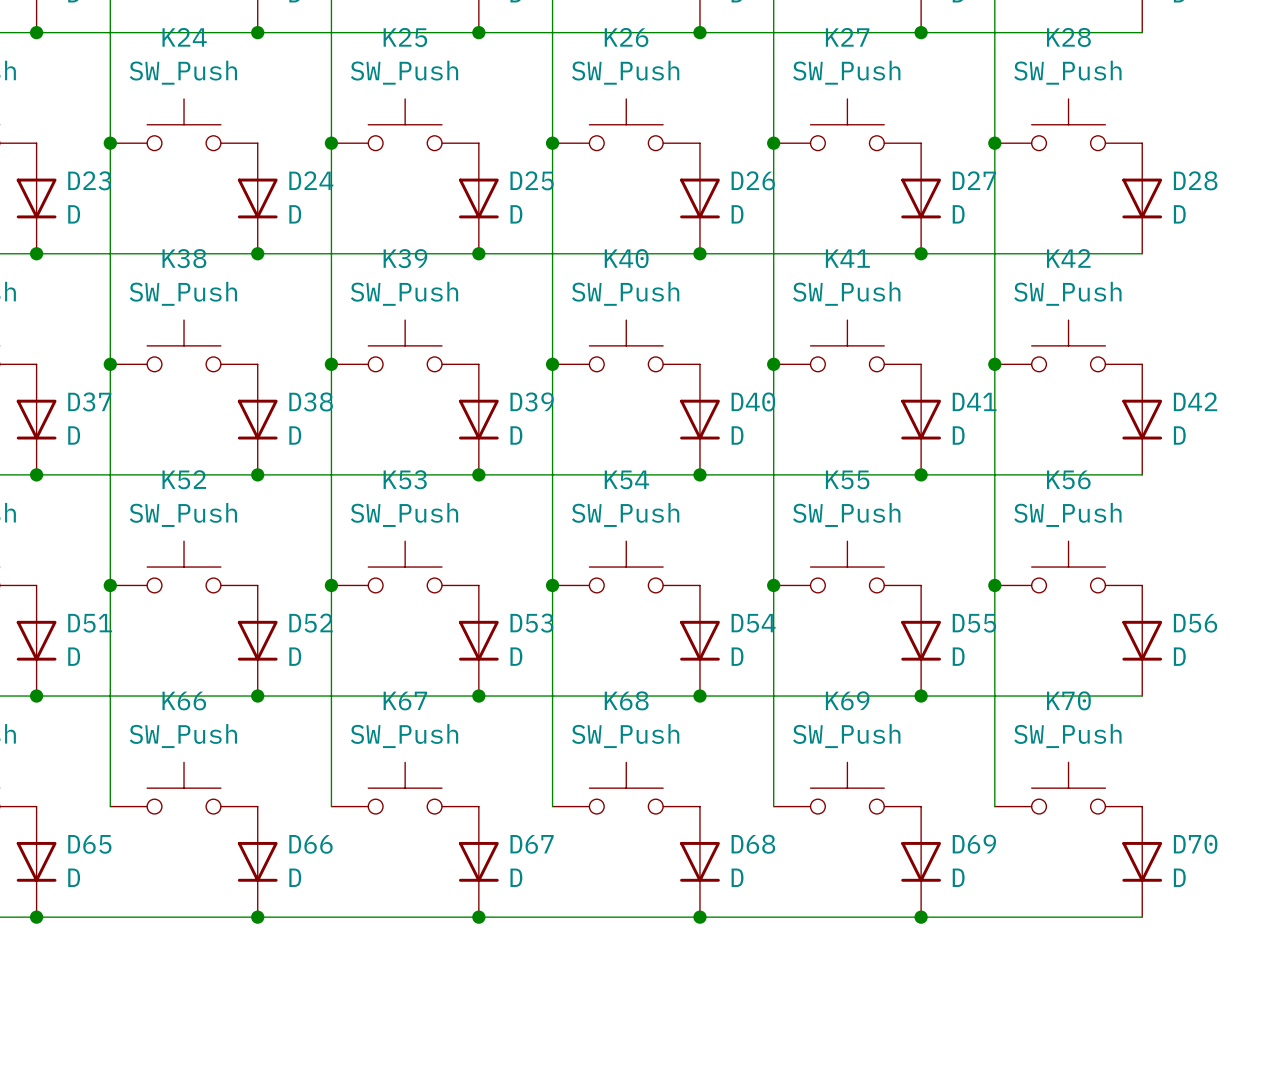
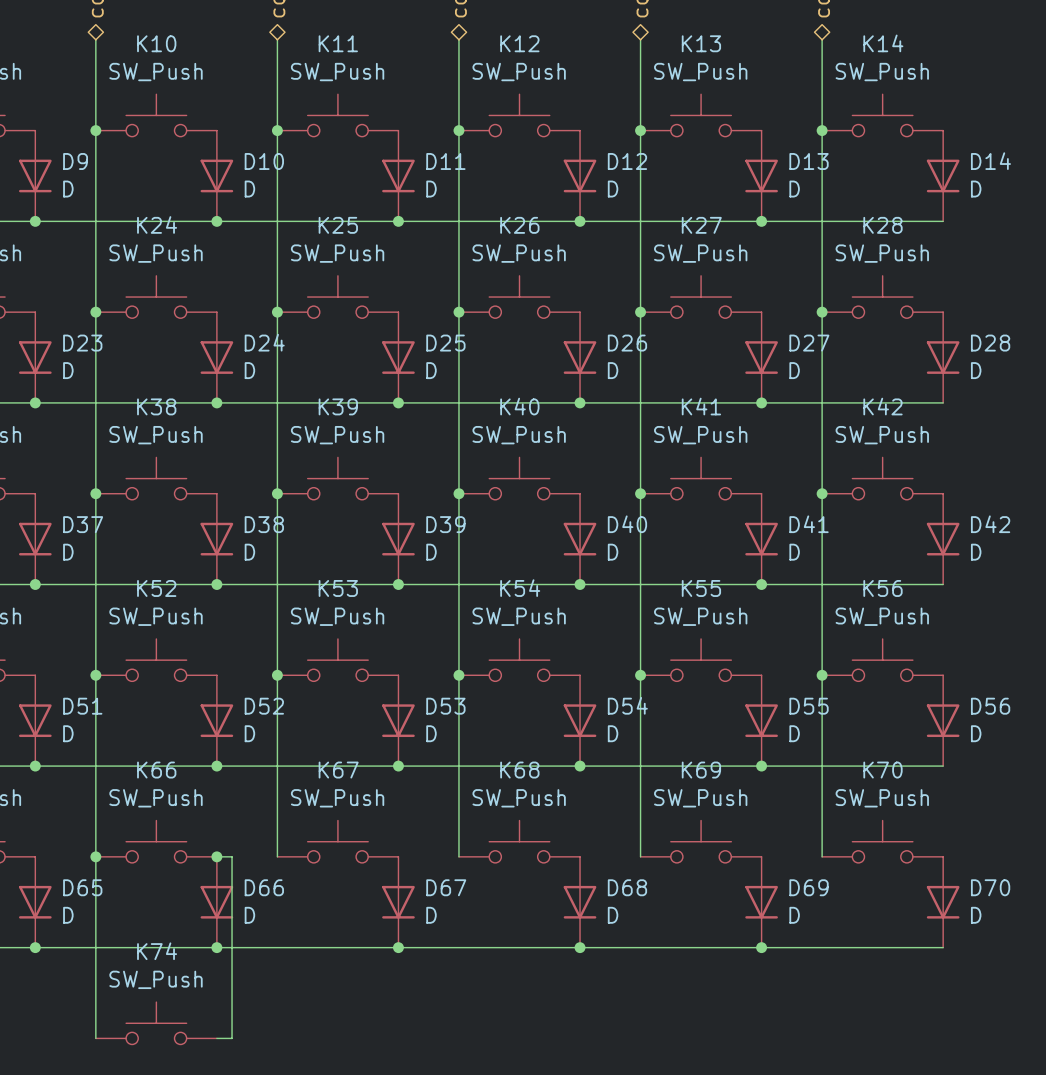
wire: none -> (95, 856) (95, 1038)
junction: none -> (95, 856)
wire: none -> (216, 856) (232, 856) (232, 1038) (216, 1038)
junction: none -> (216, 856)
K74: none -> SW_Push (156, 1023)

